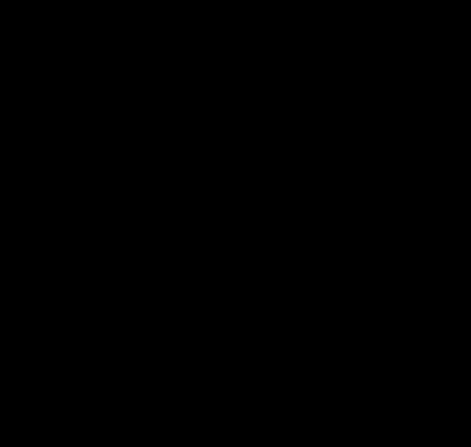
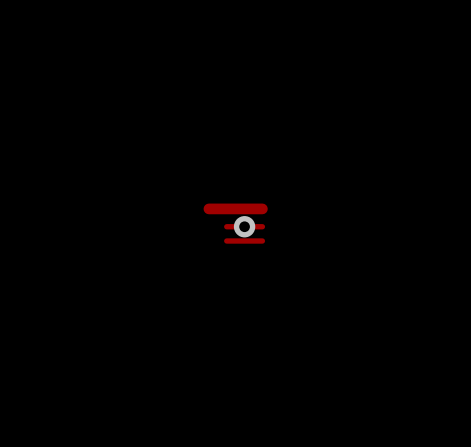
top track: none -> (262, 208) (208, 208)
via: none -> (244, 226)
top track: none -> (262, 226) (226, 226)
top track: none -> (262, 241) (226, 241)

